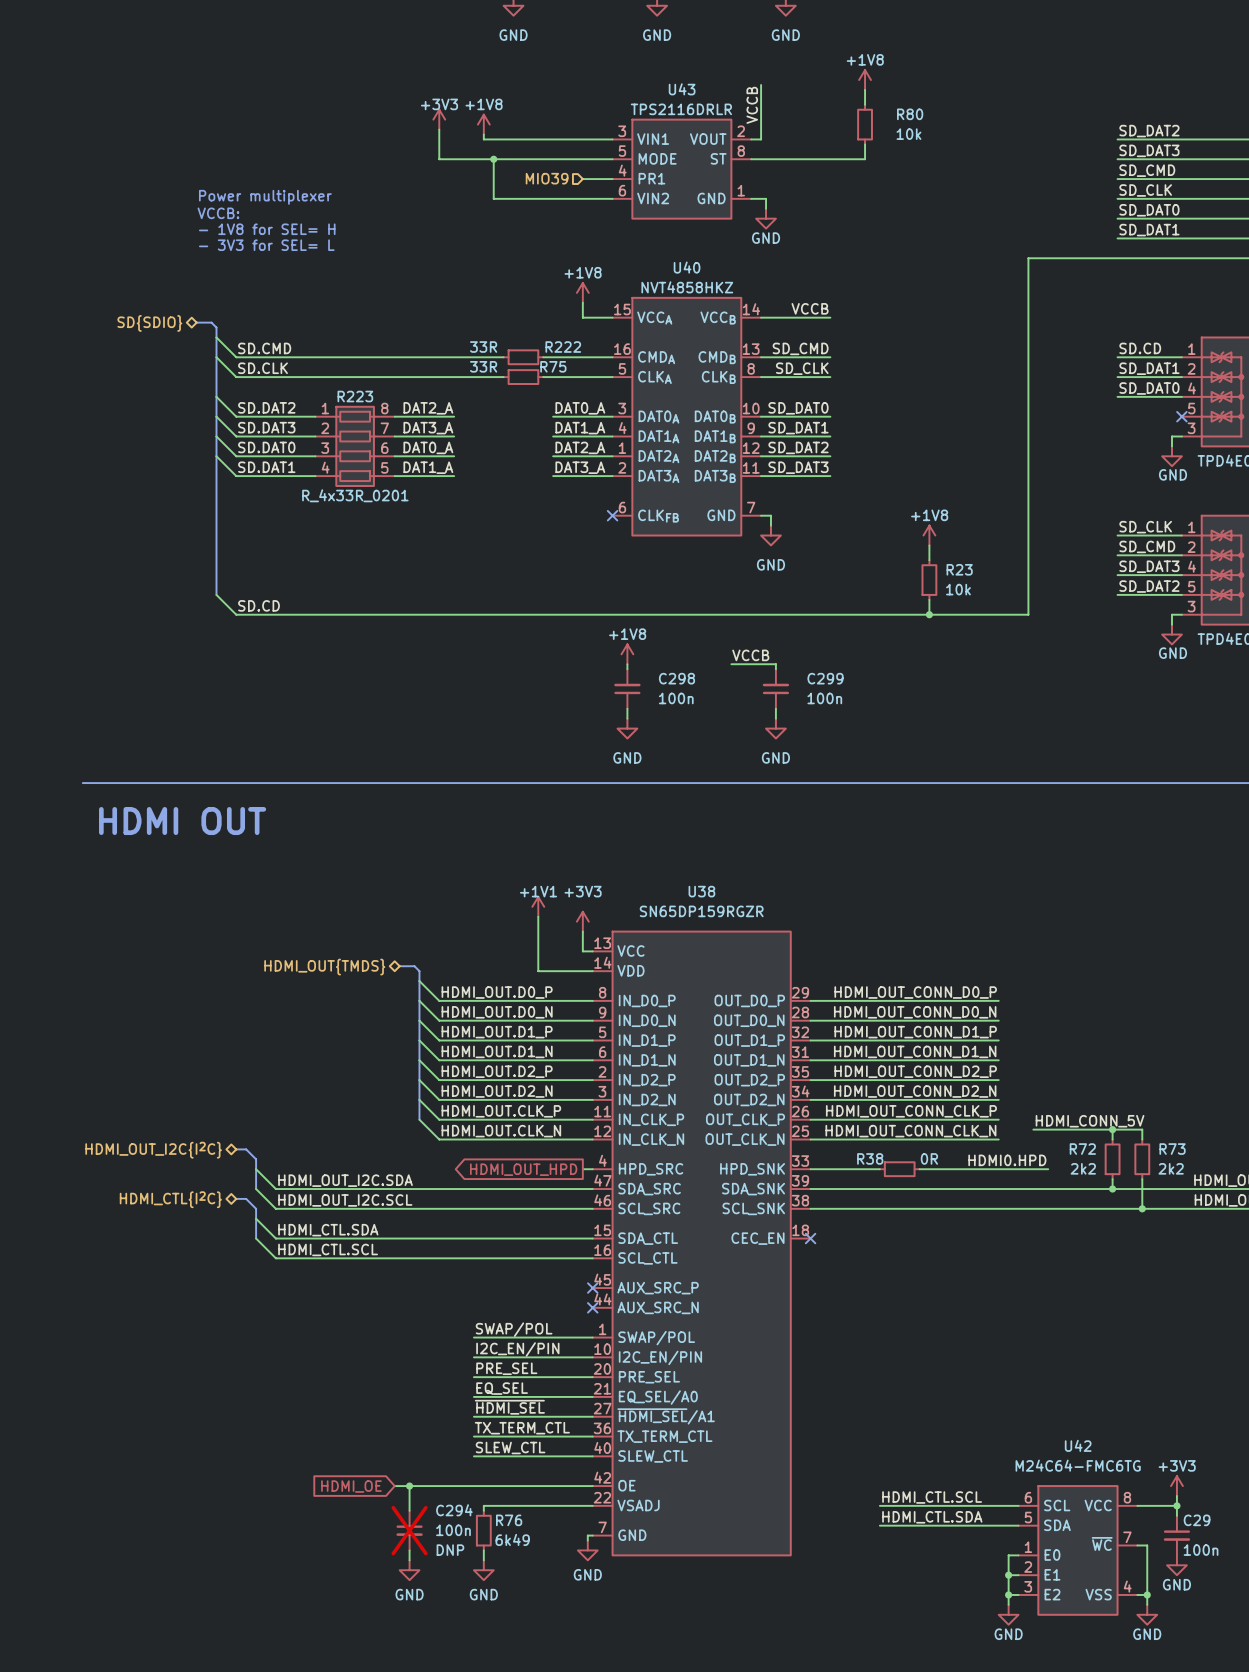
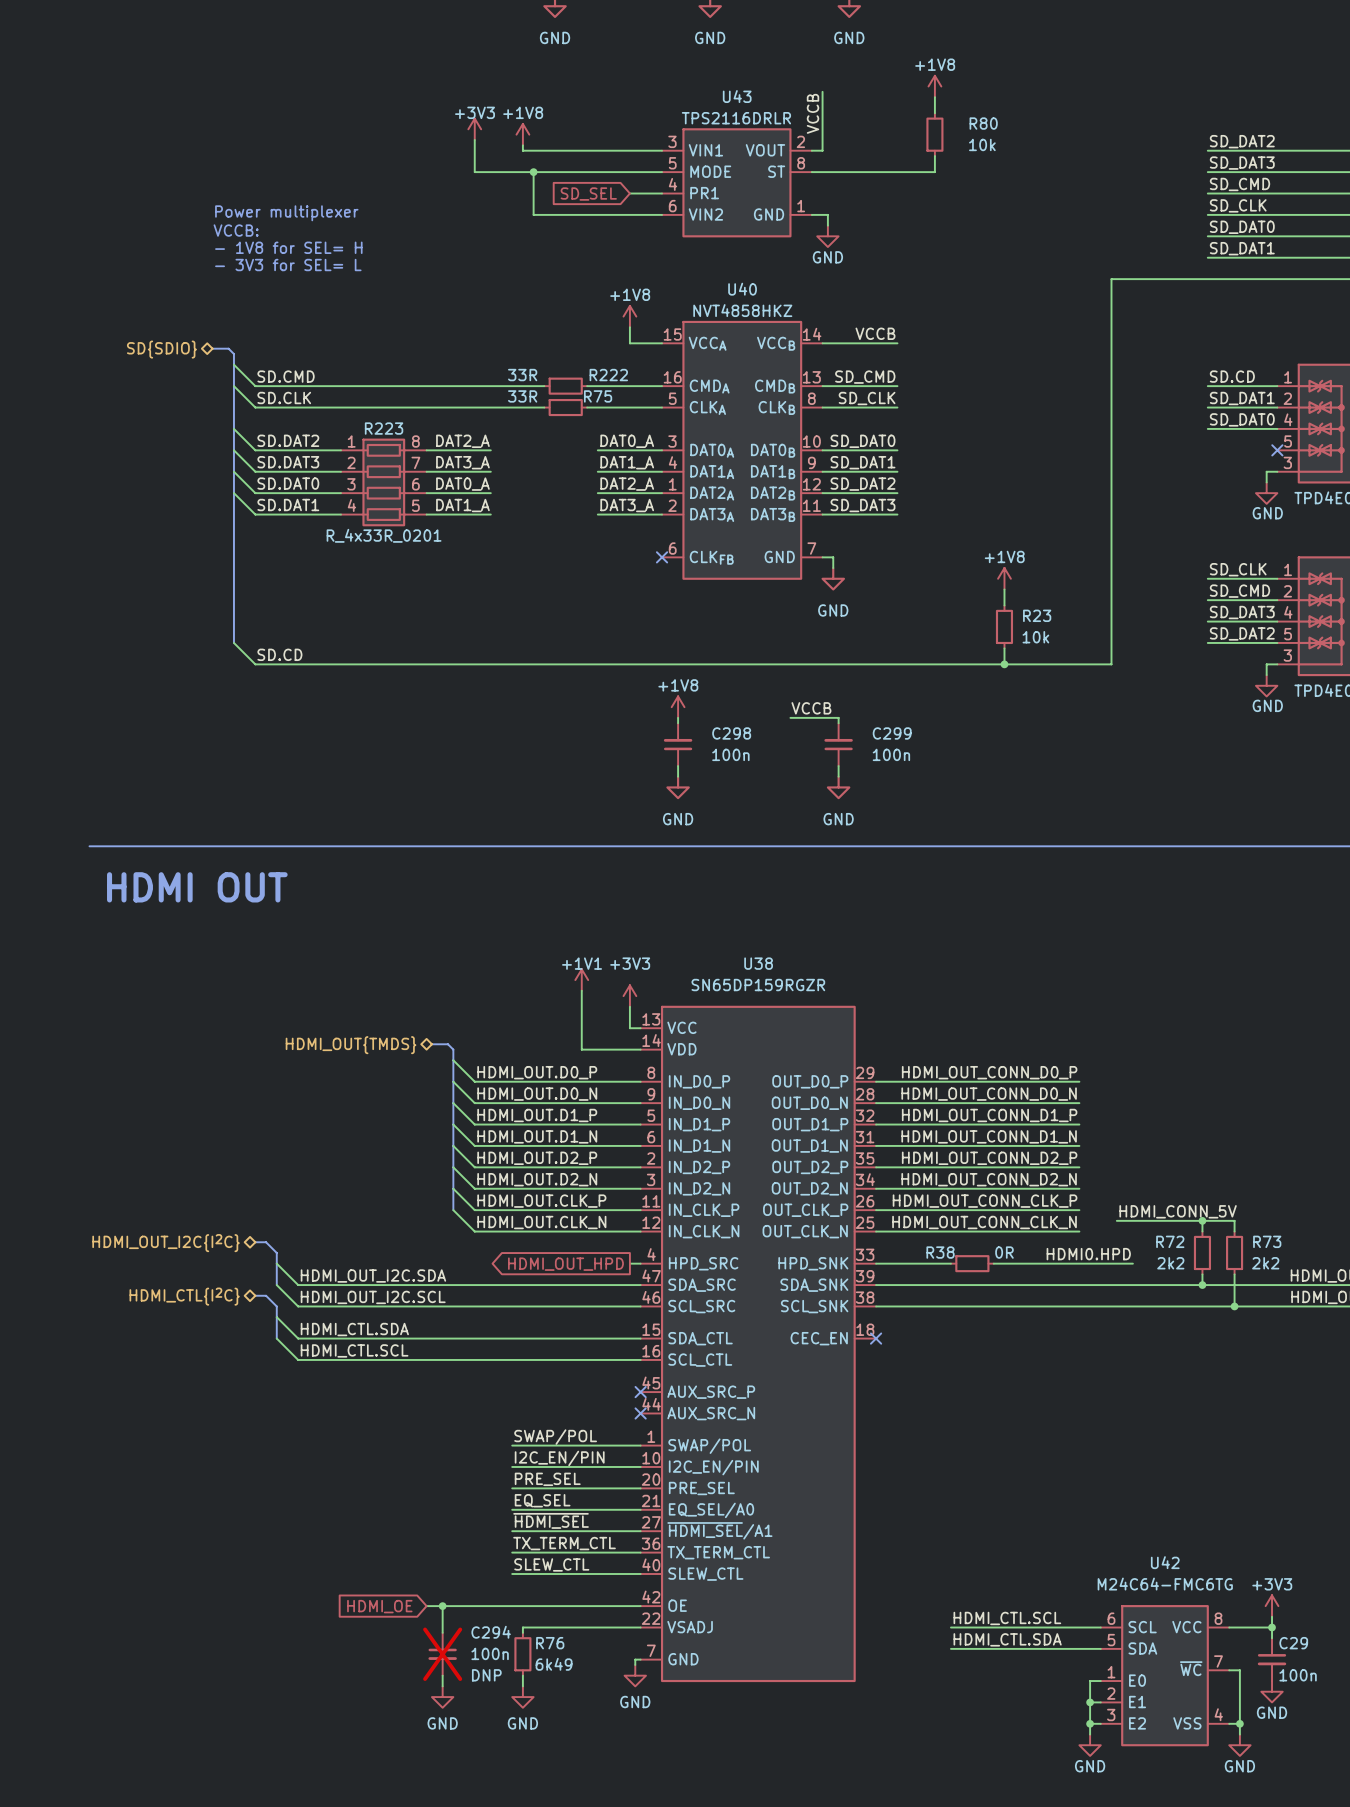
hierarchical label: MIO39 (547, 178) -> none
global label: none -> SD_SEL (588, 194)

